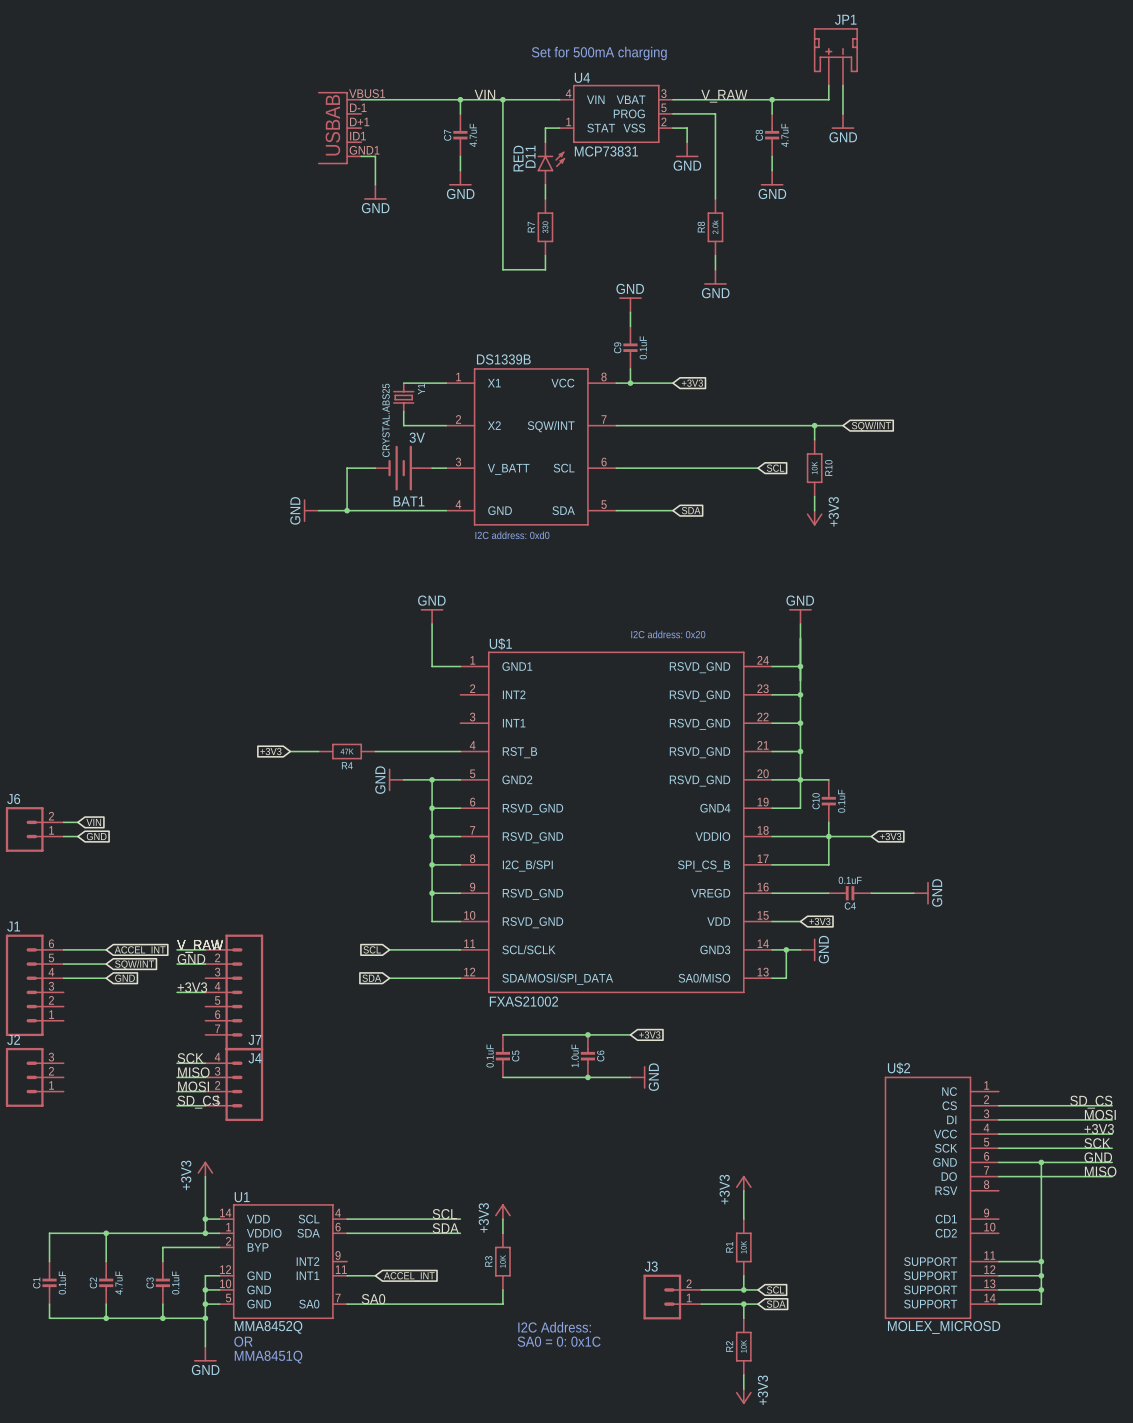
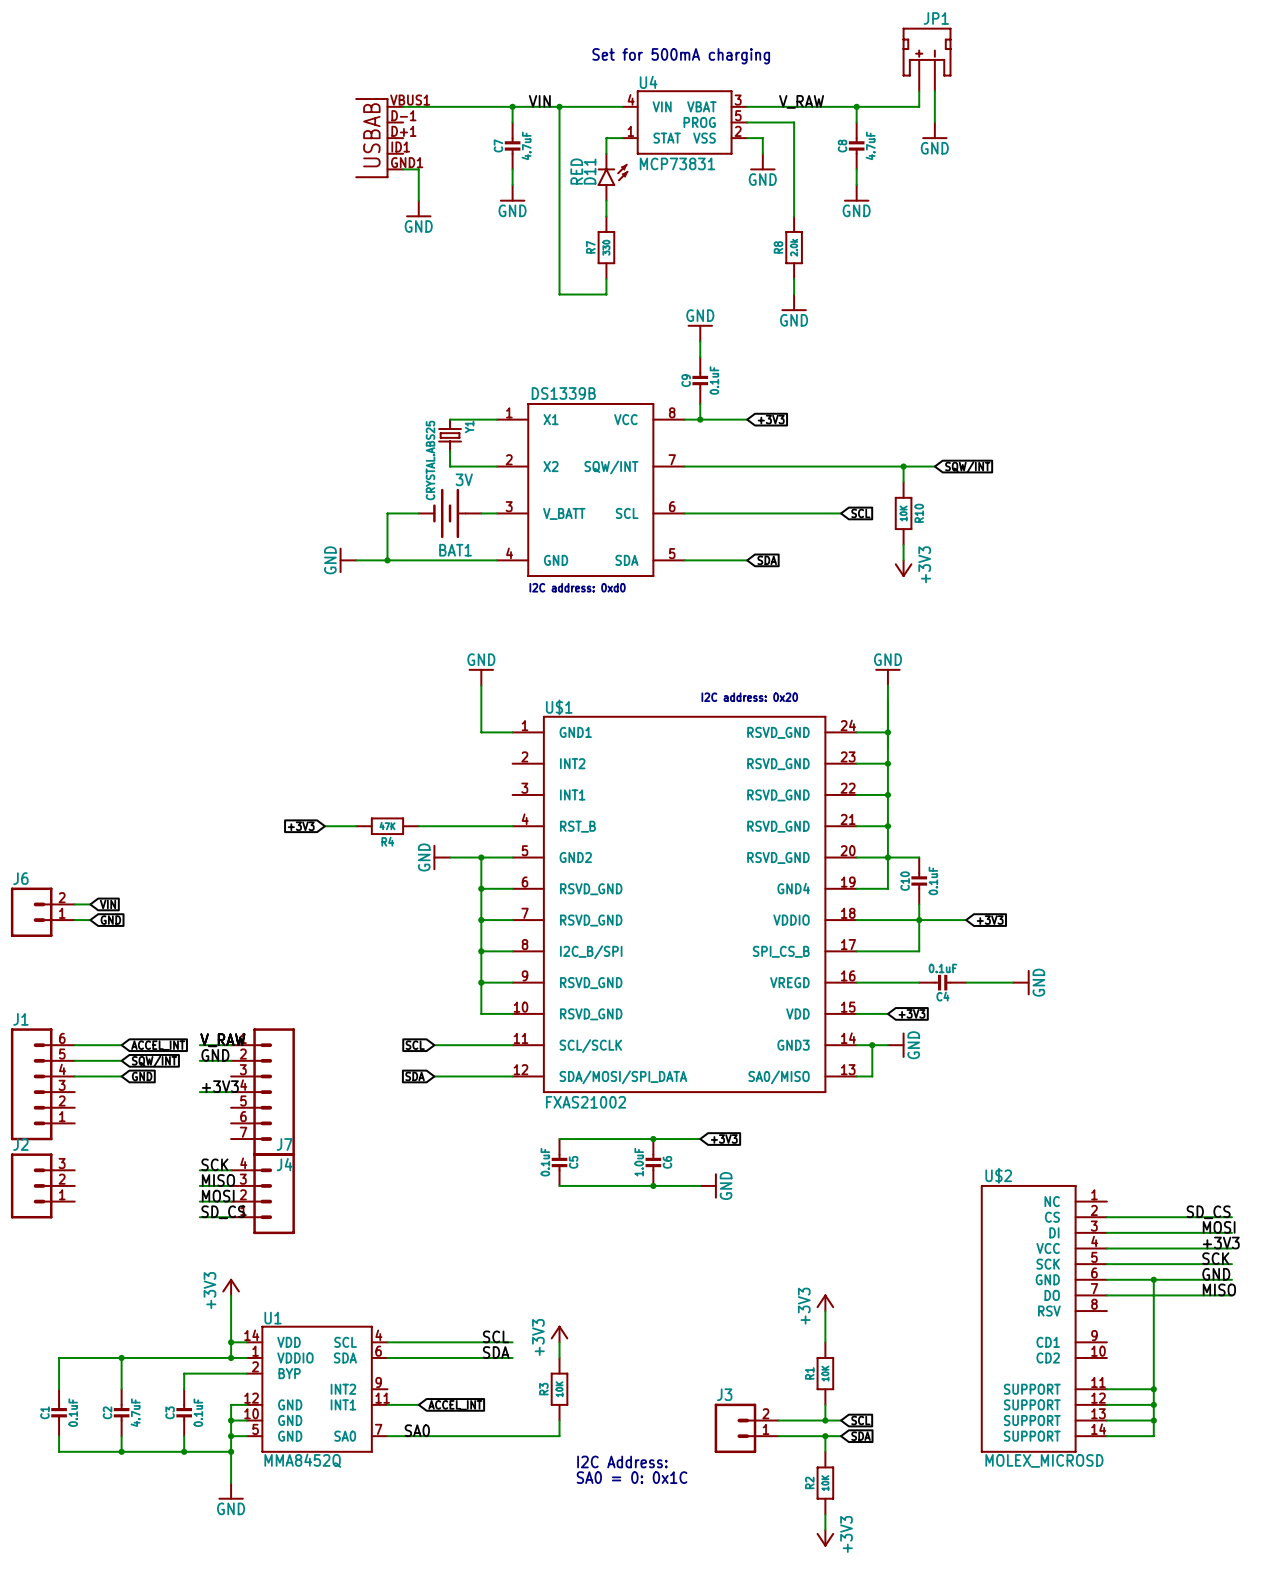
text: OR (243, 1341) -> none
text: MMA8451Q (268, 1357) -> none

